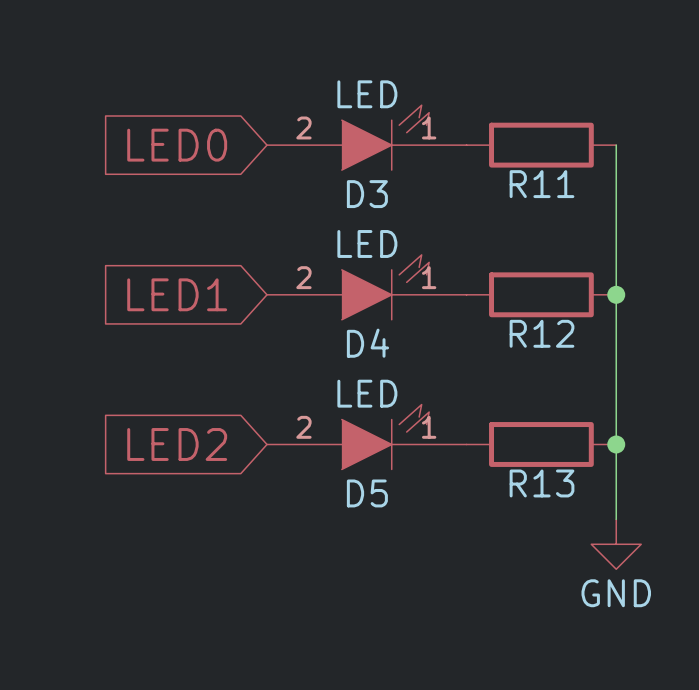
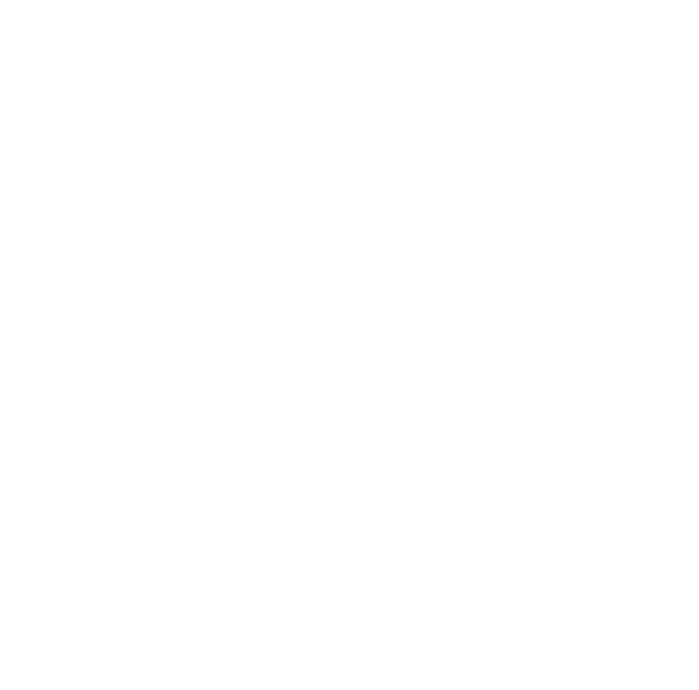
D3: LED (366, 137) -> none
global label: LED0 (177, 145) -> none
R11: (541, 145) -> none
wire: (616, 145) (616, 519) -> none
D4: LED (366, 287) -> none
global label: LED1 (177, 294) -> none
R12: (541, 294) -> none
junction: (616, 294) -> none
D5: LED (366, 437) -> none
global label: LED2 (177, 444) -> none
R13: (541, 444) -> none
junction: (616, 444) -> none
power symbol: GND (616, 544) -> none

